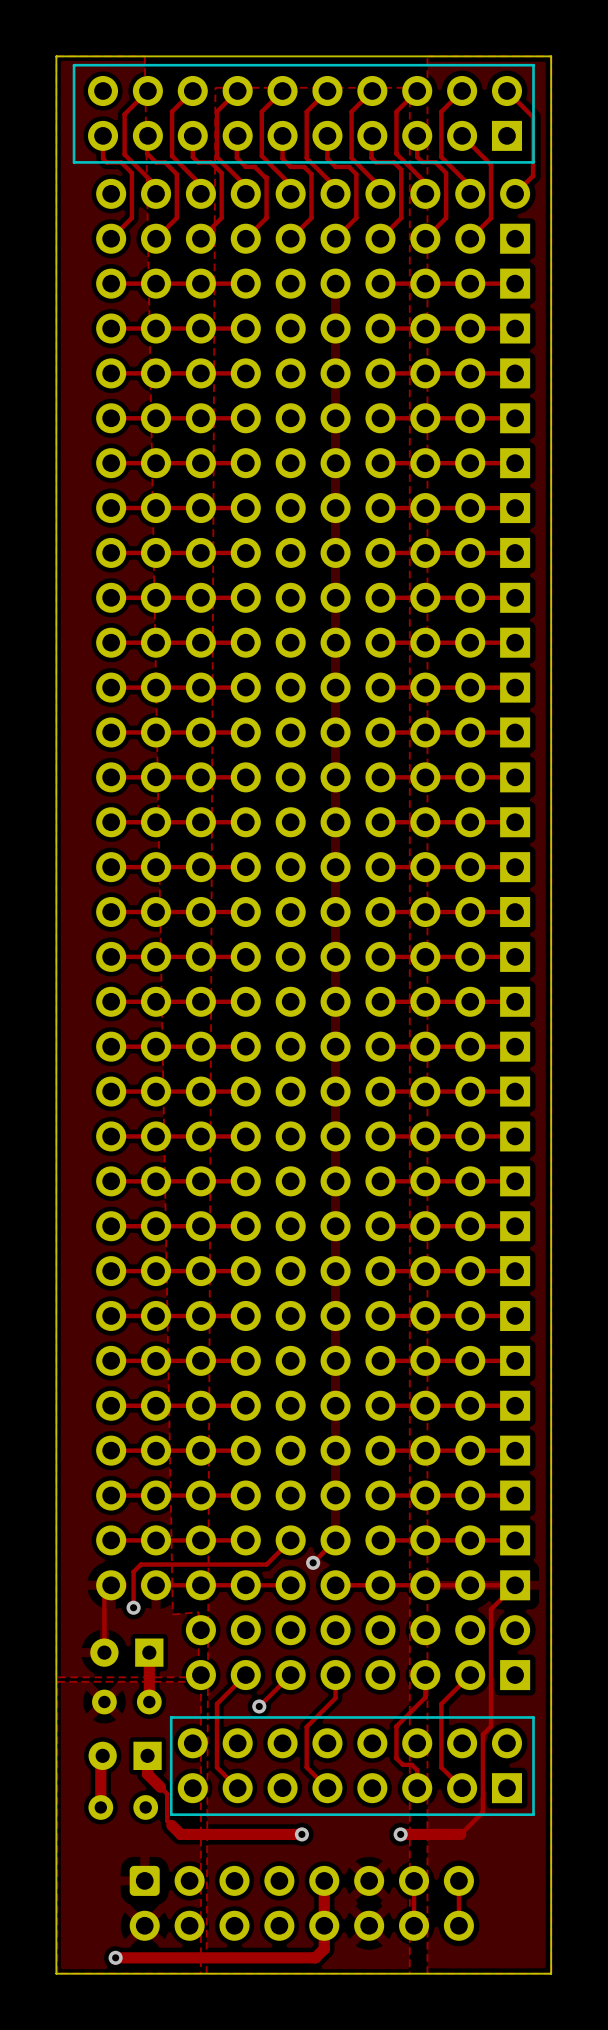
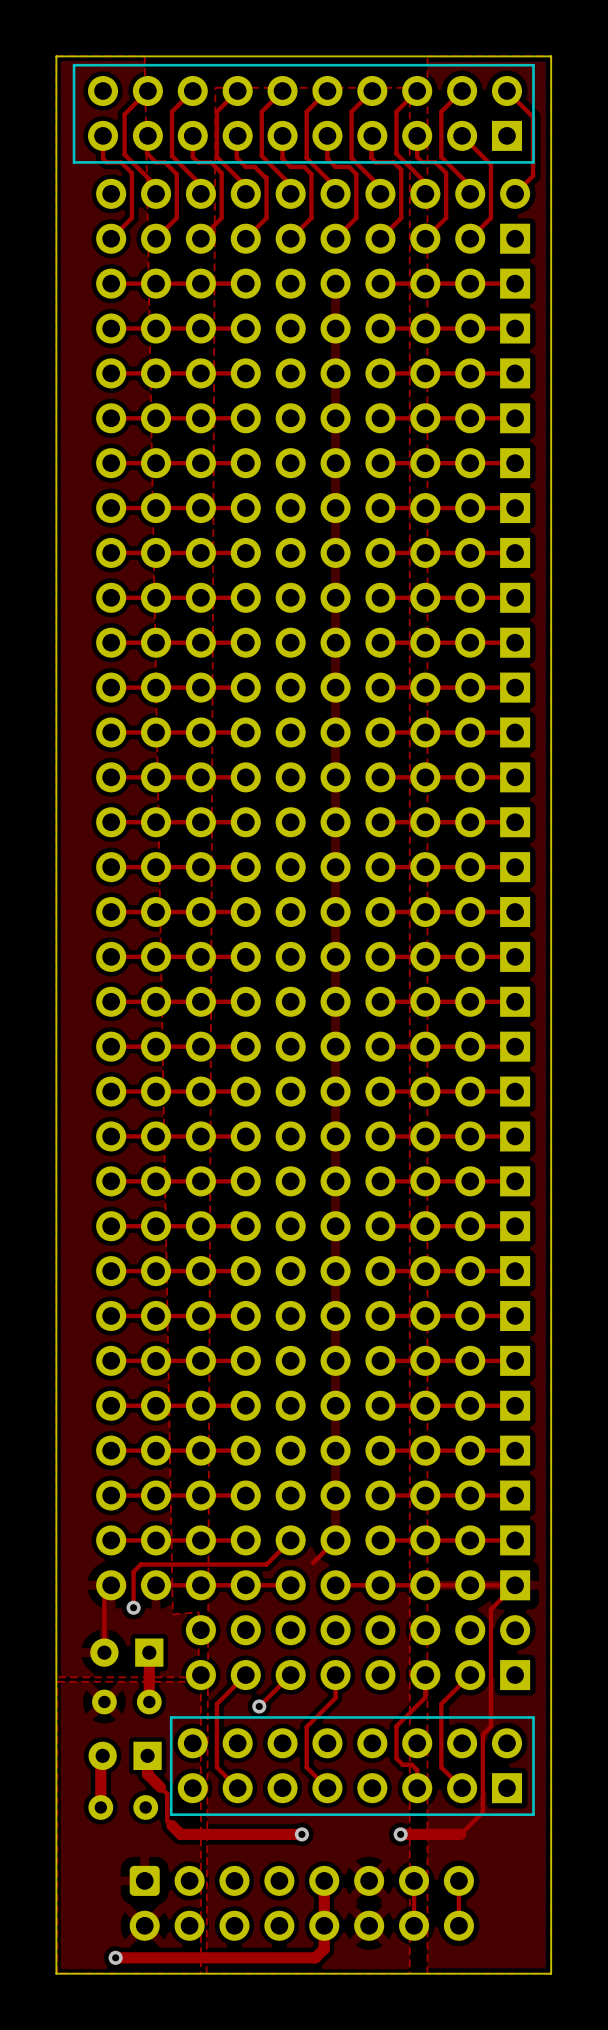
via: (313, 1562) -> none

